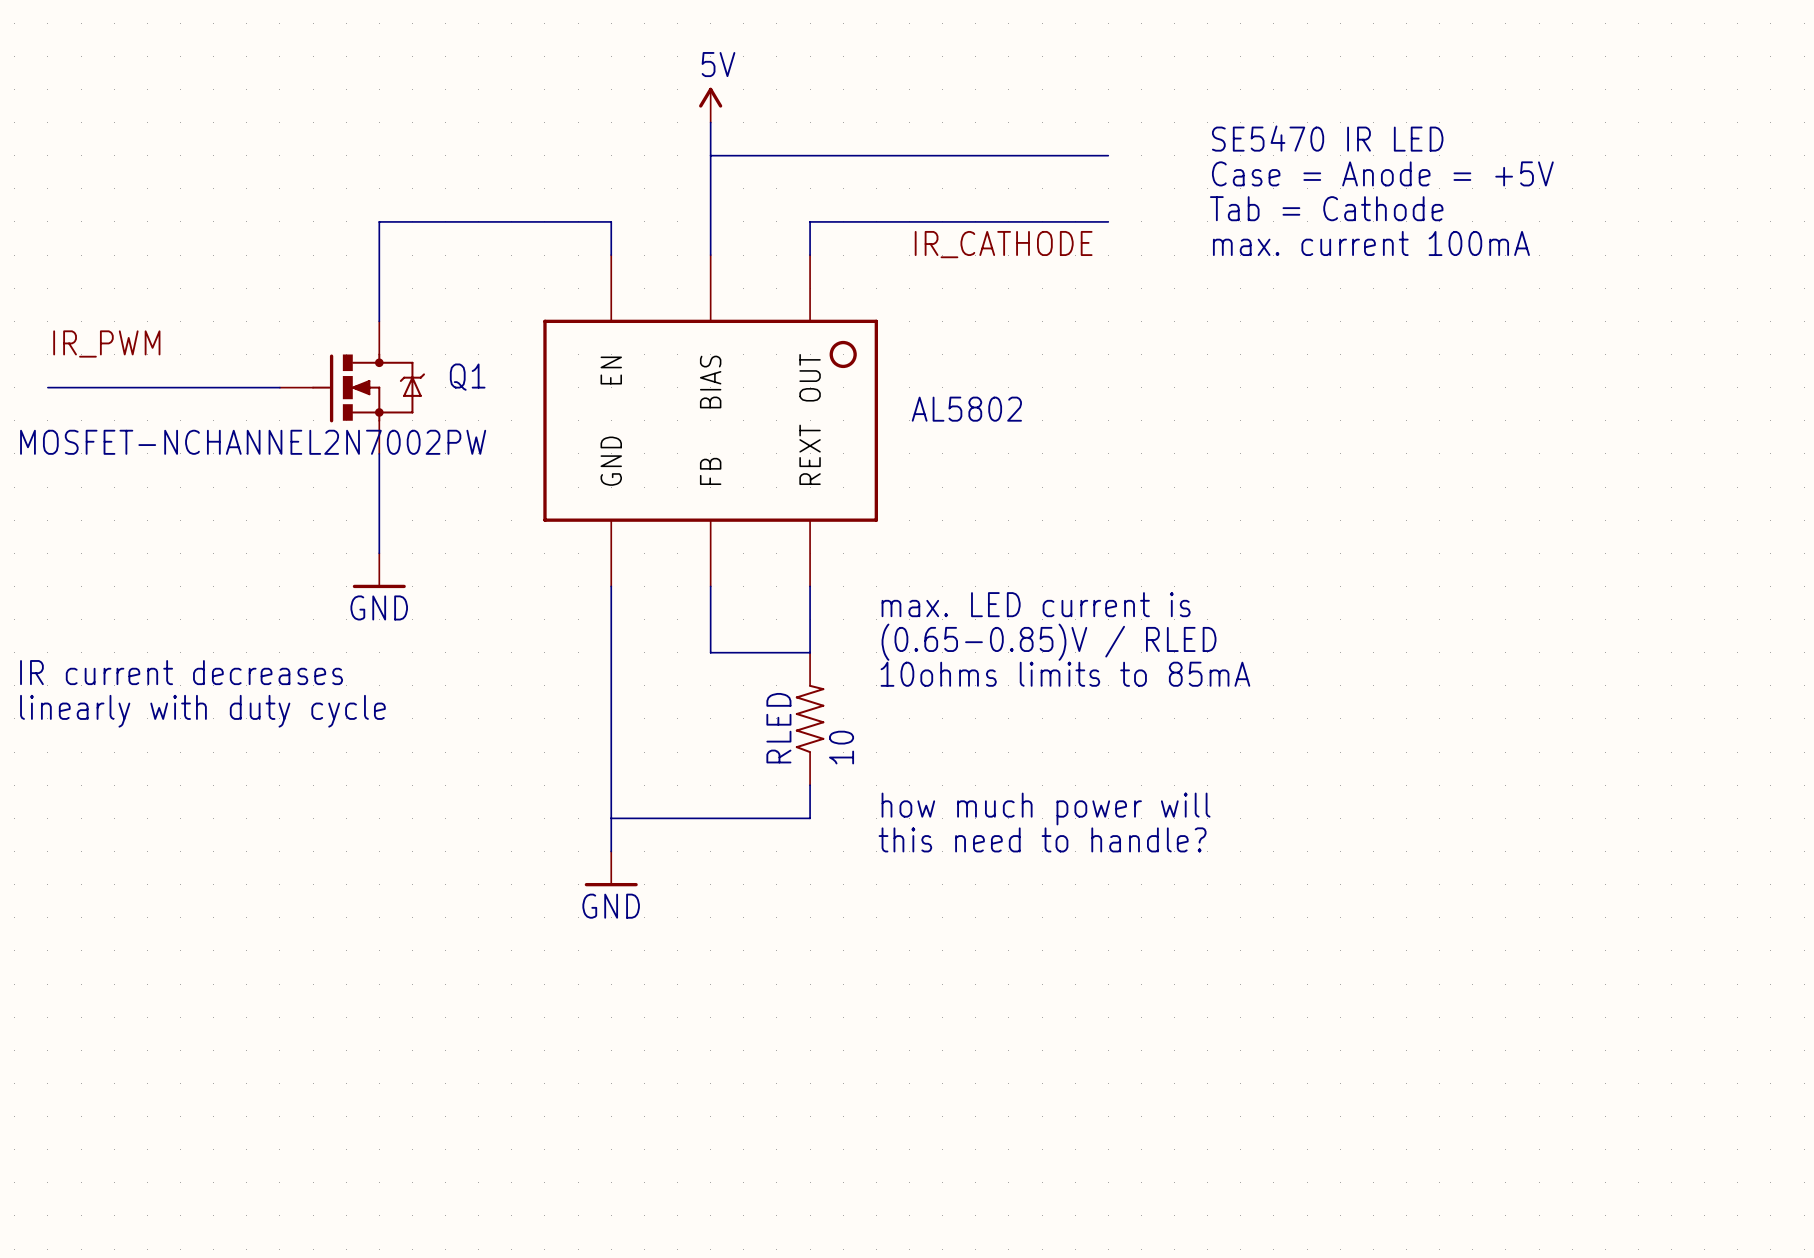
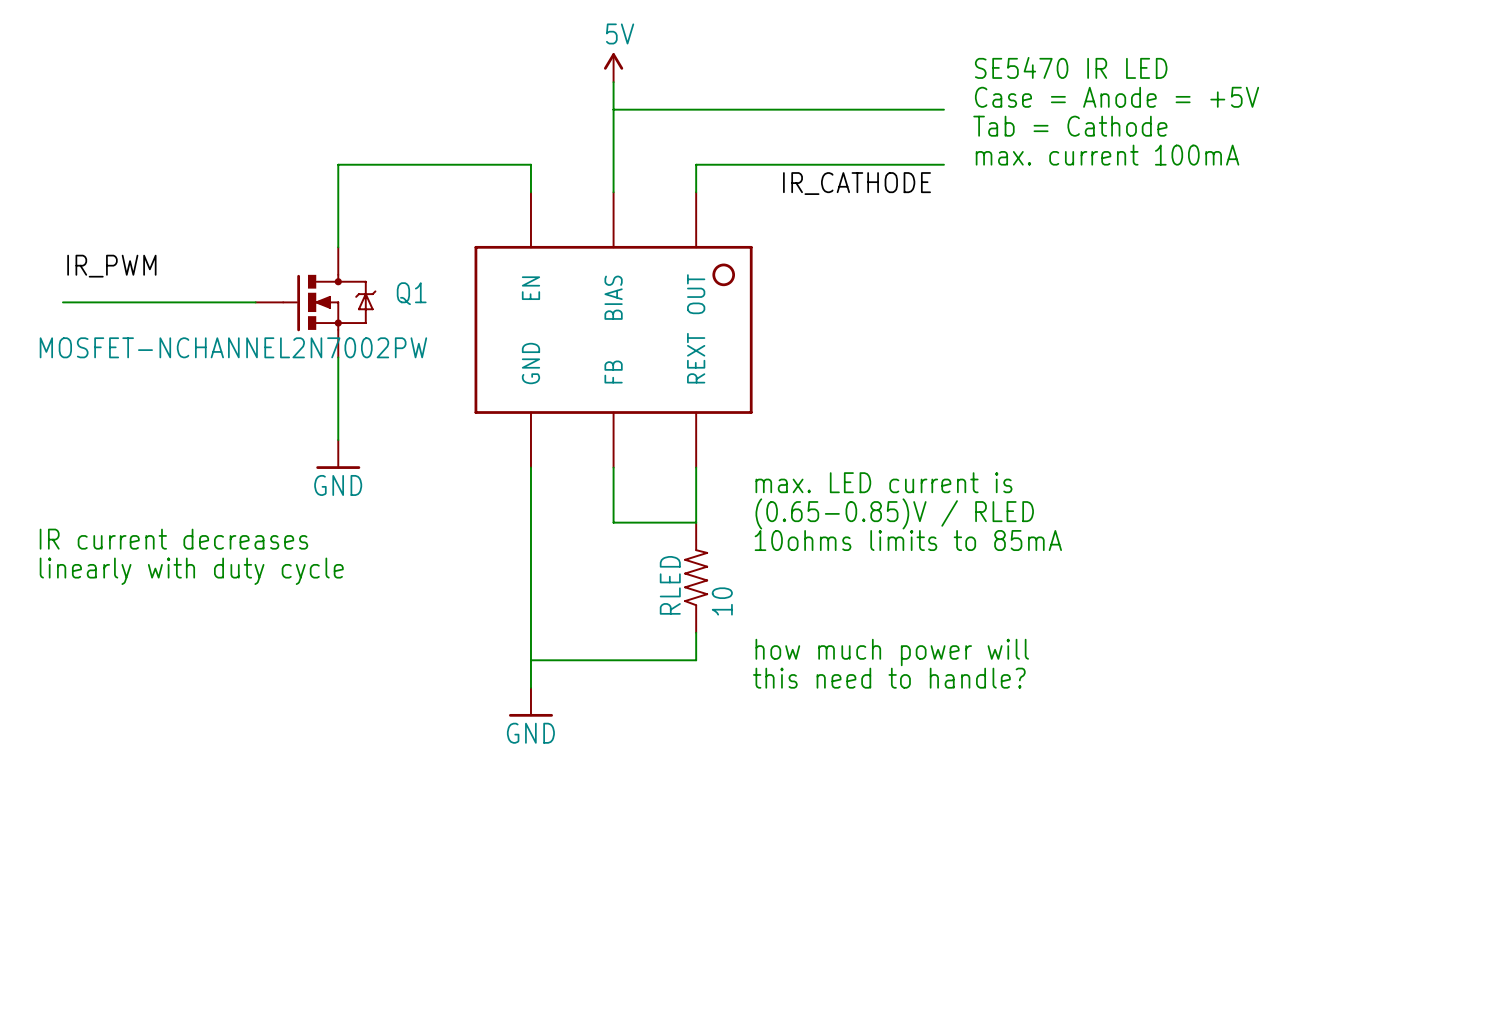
text position: SE5470 IR LED (1327, 138) -> SE5470 IR LED (1071, 67)
text position: Case = Anode = +5V (1382, 173) -> Case = Anode = +5V (1117, 97)
text position: Tab = Cathode (1326, 208) -> Tab = Cathode (1070, 126)
text position: max. current 100mA (1371, 243) -> max. current 100mA (1107, 155)
text: AL5802 (966, 409) -> none

